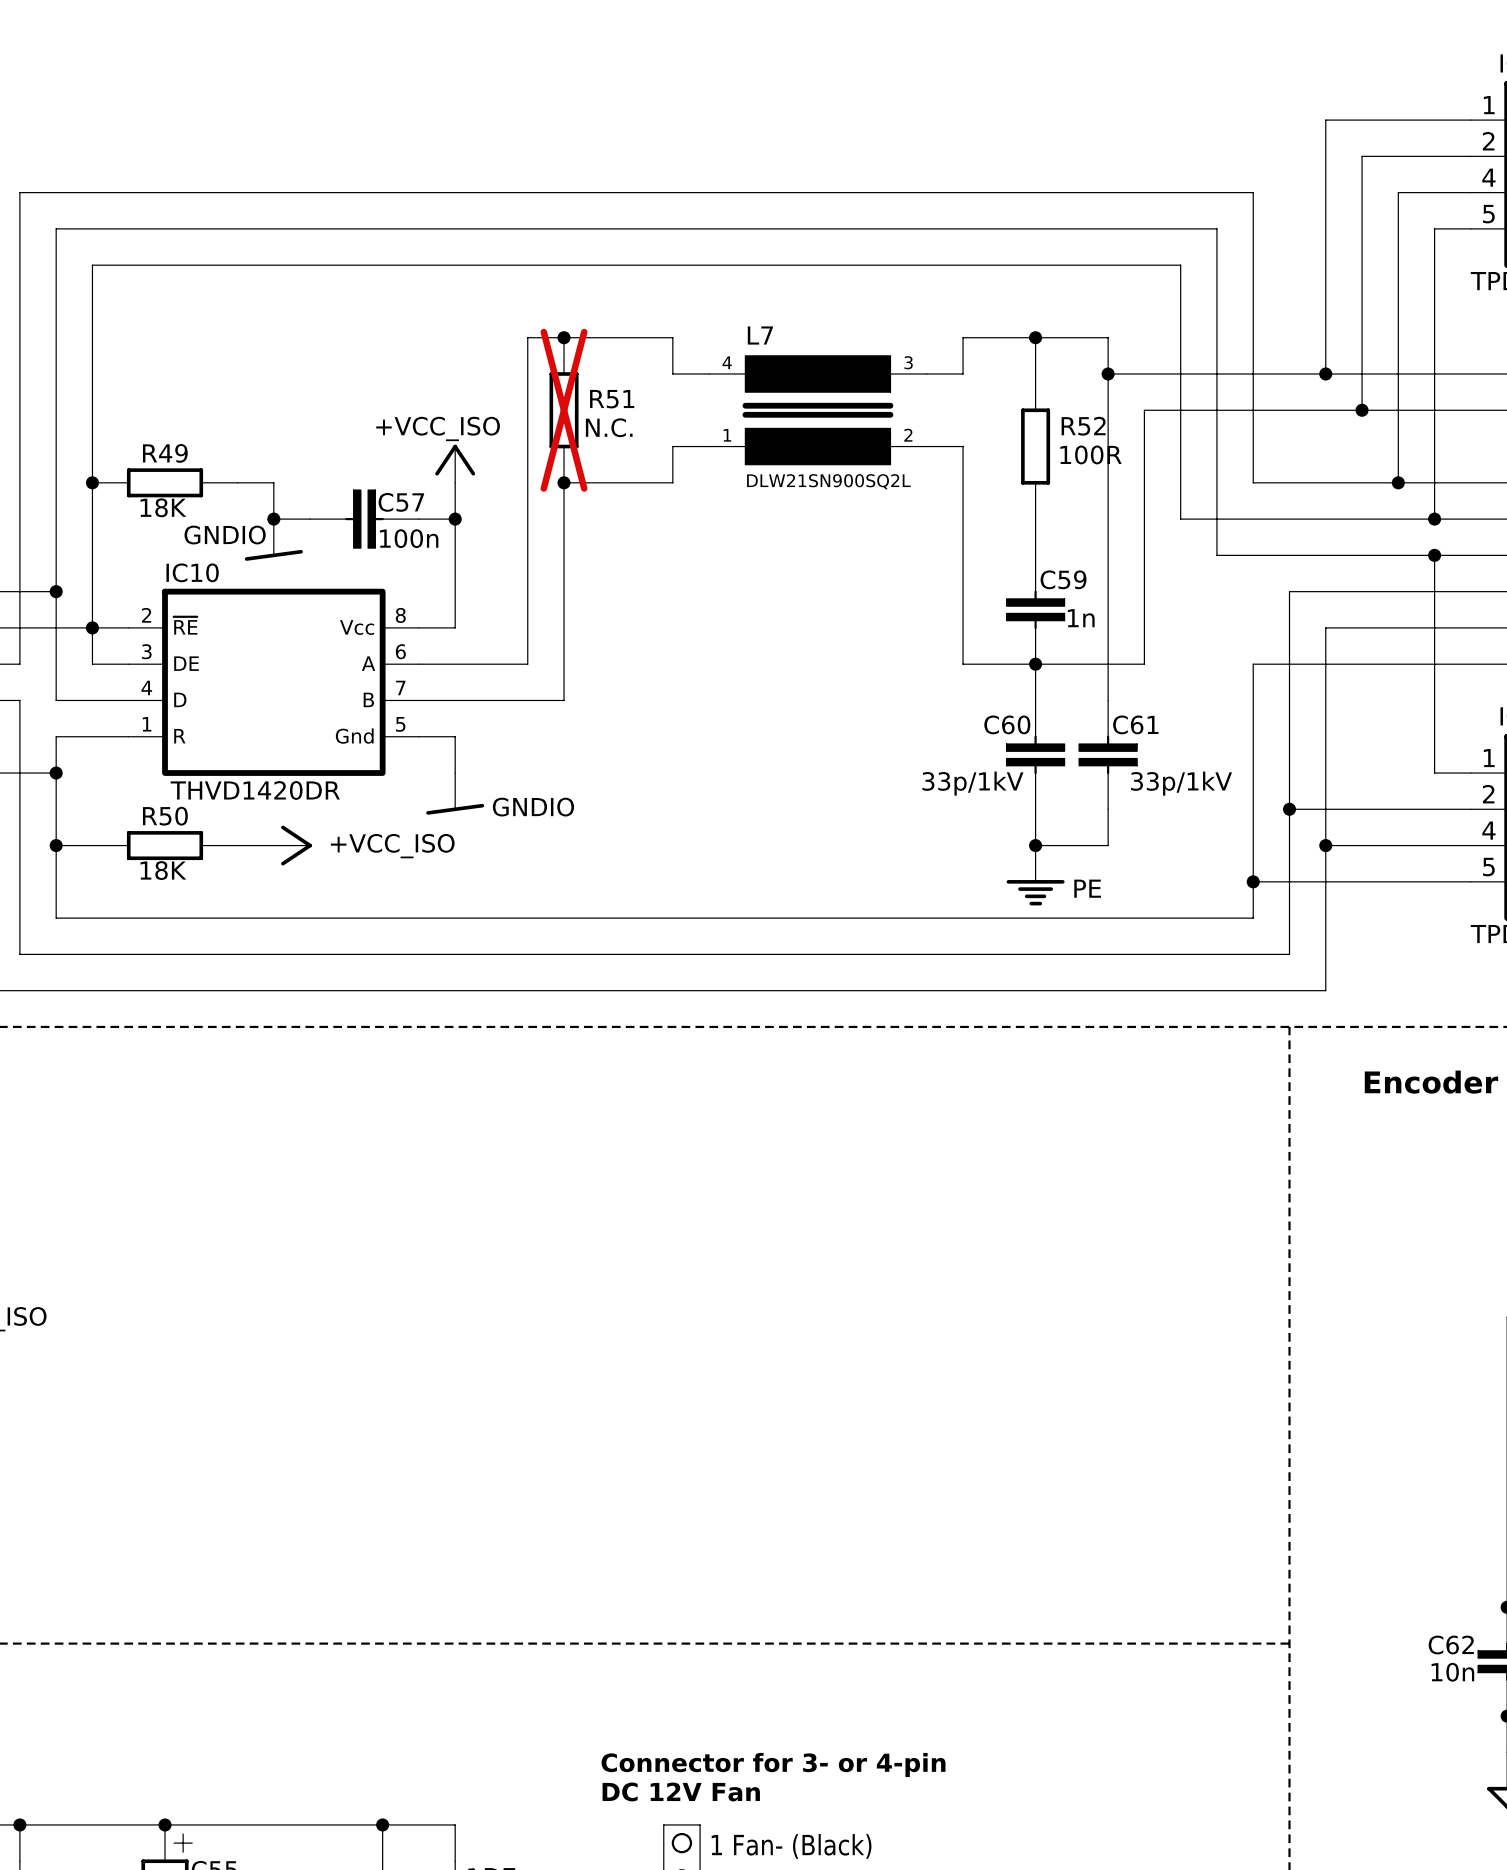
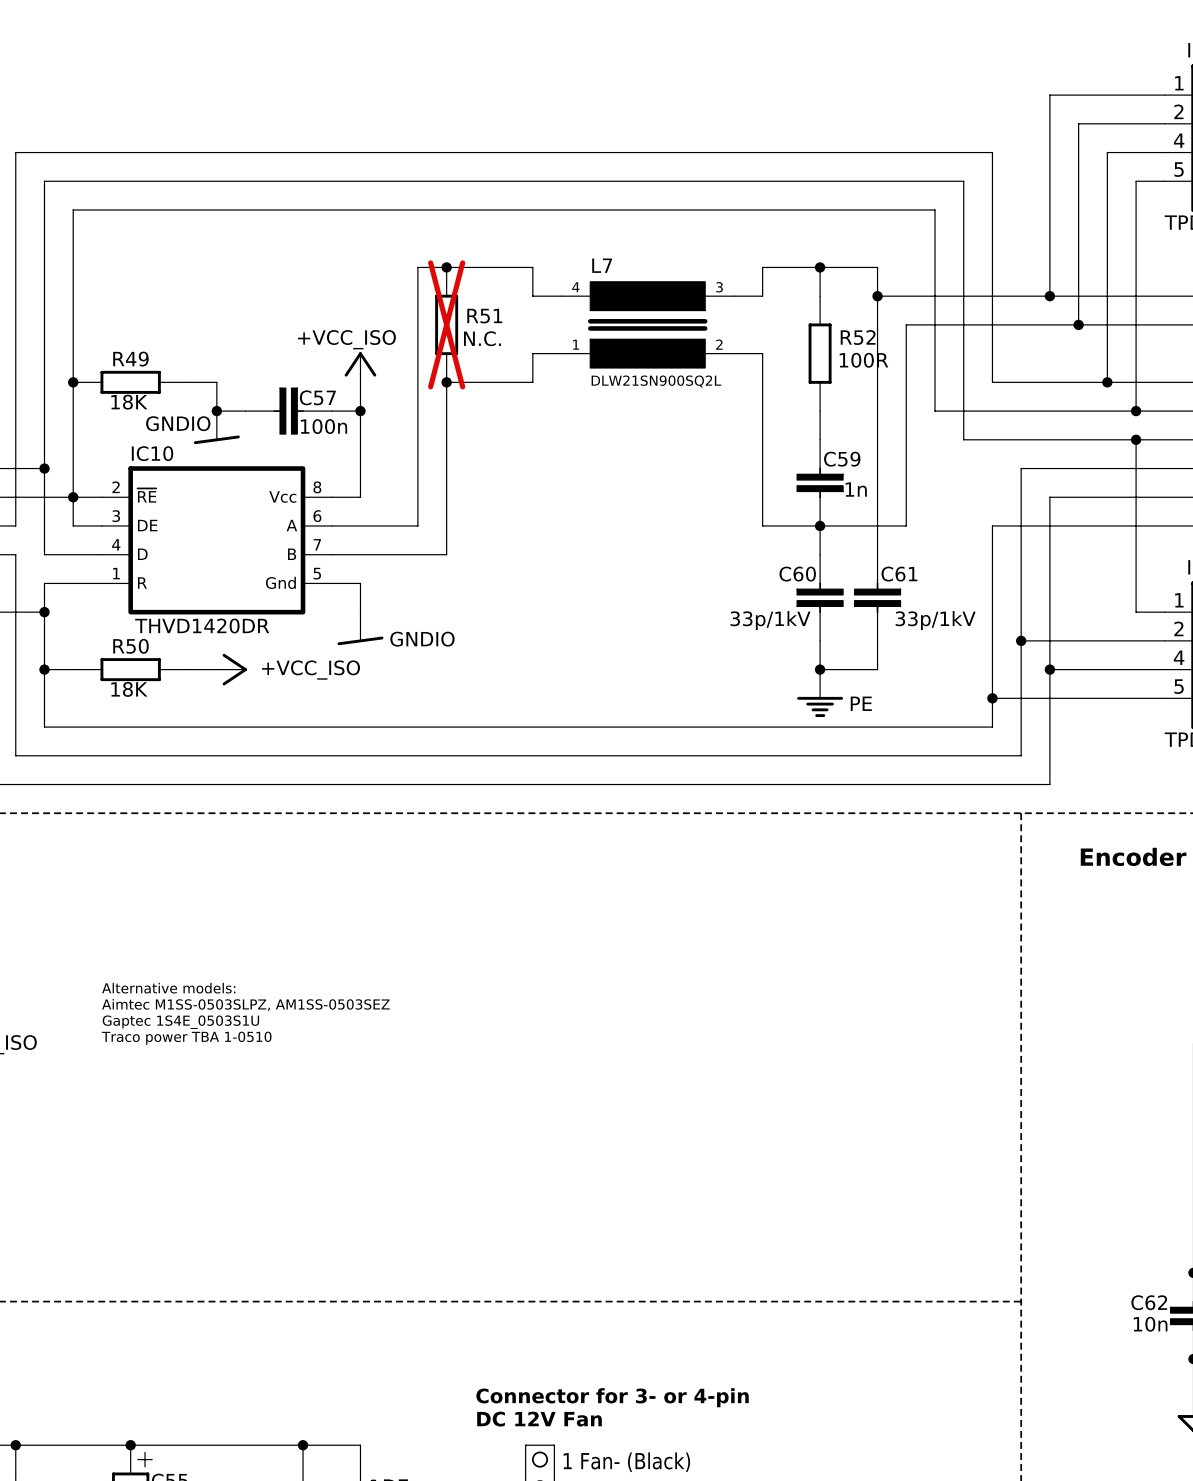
text: none -> Alternative models: (168, 988)
text: none -> Aimtec M1SS-0503SLPZ, AM1SS-0503SEZ (245, 1005)
text: none -> Gaptec 1S4E_0503S1U (180, 1022)
text: none -> Traco power TBA 1-0510 (186, 1038)

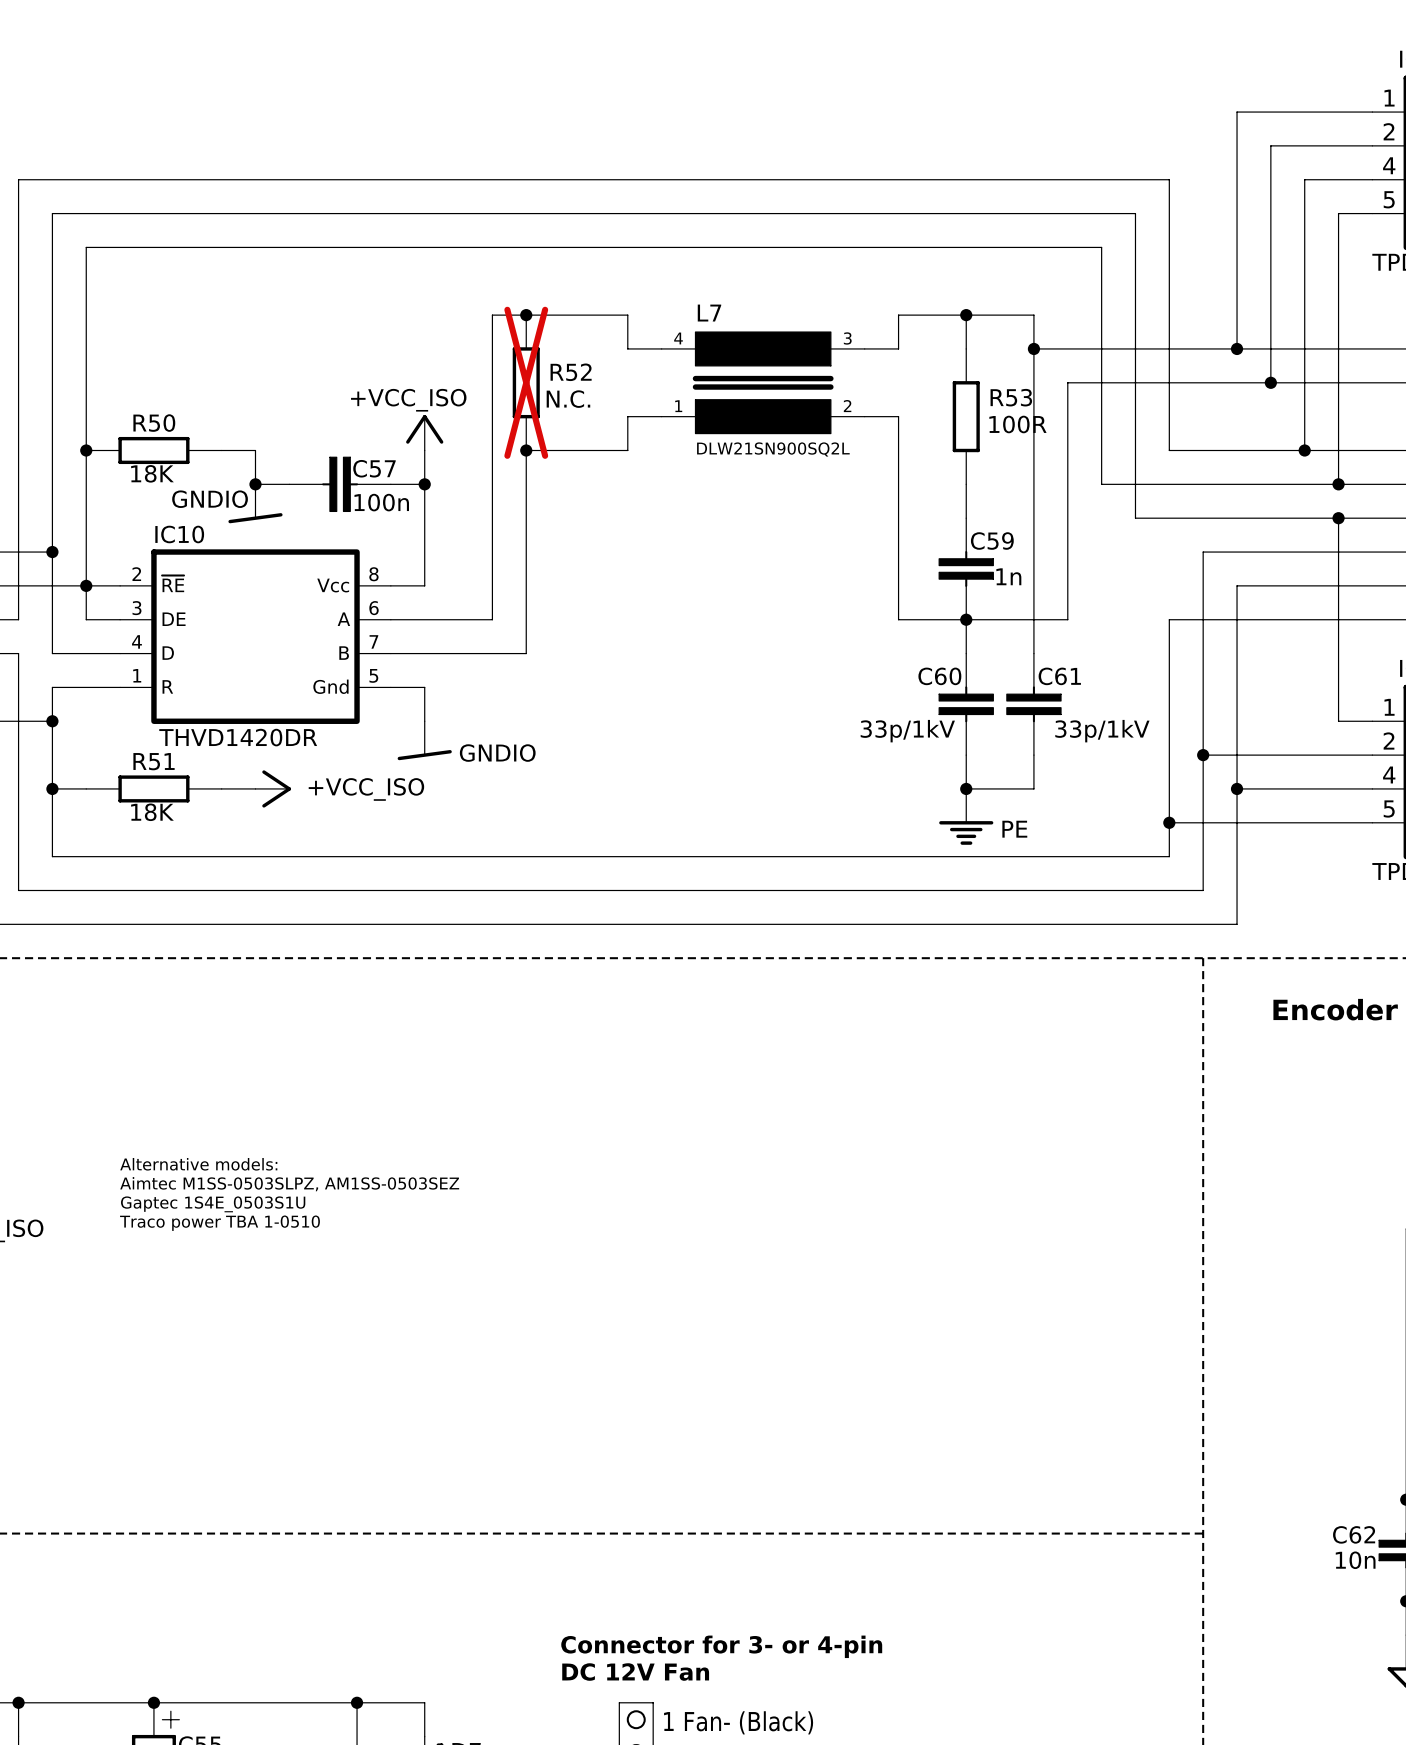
R51 name: R51 (484, 316) -> R52 (571, 372)
R52 name: R52 (858, 337) -> R53 (1011, 397)
R49 name: R49 (130, 359) -> R50 (154, 423)
R50 name: R50 (130, 646) -> R51 (154, 761)

